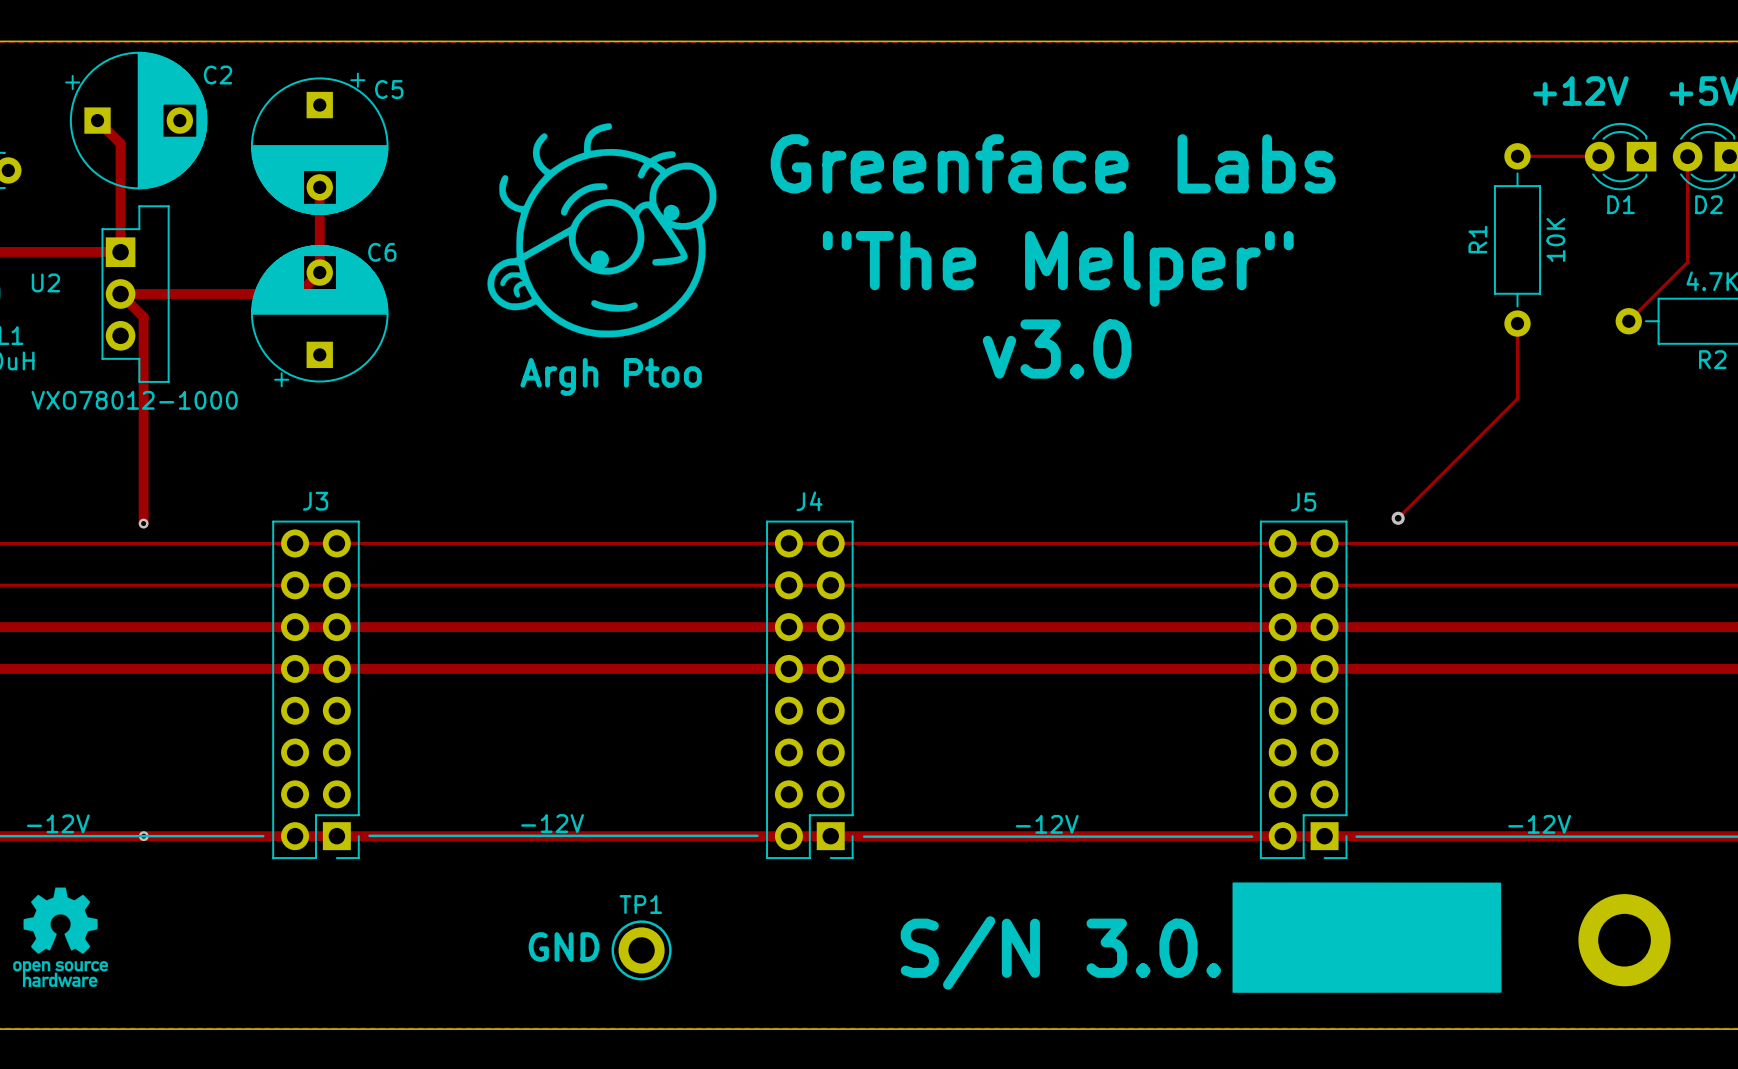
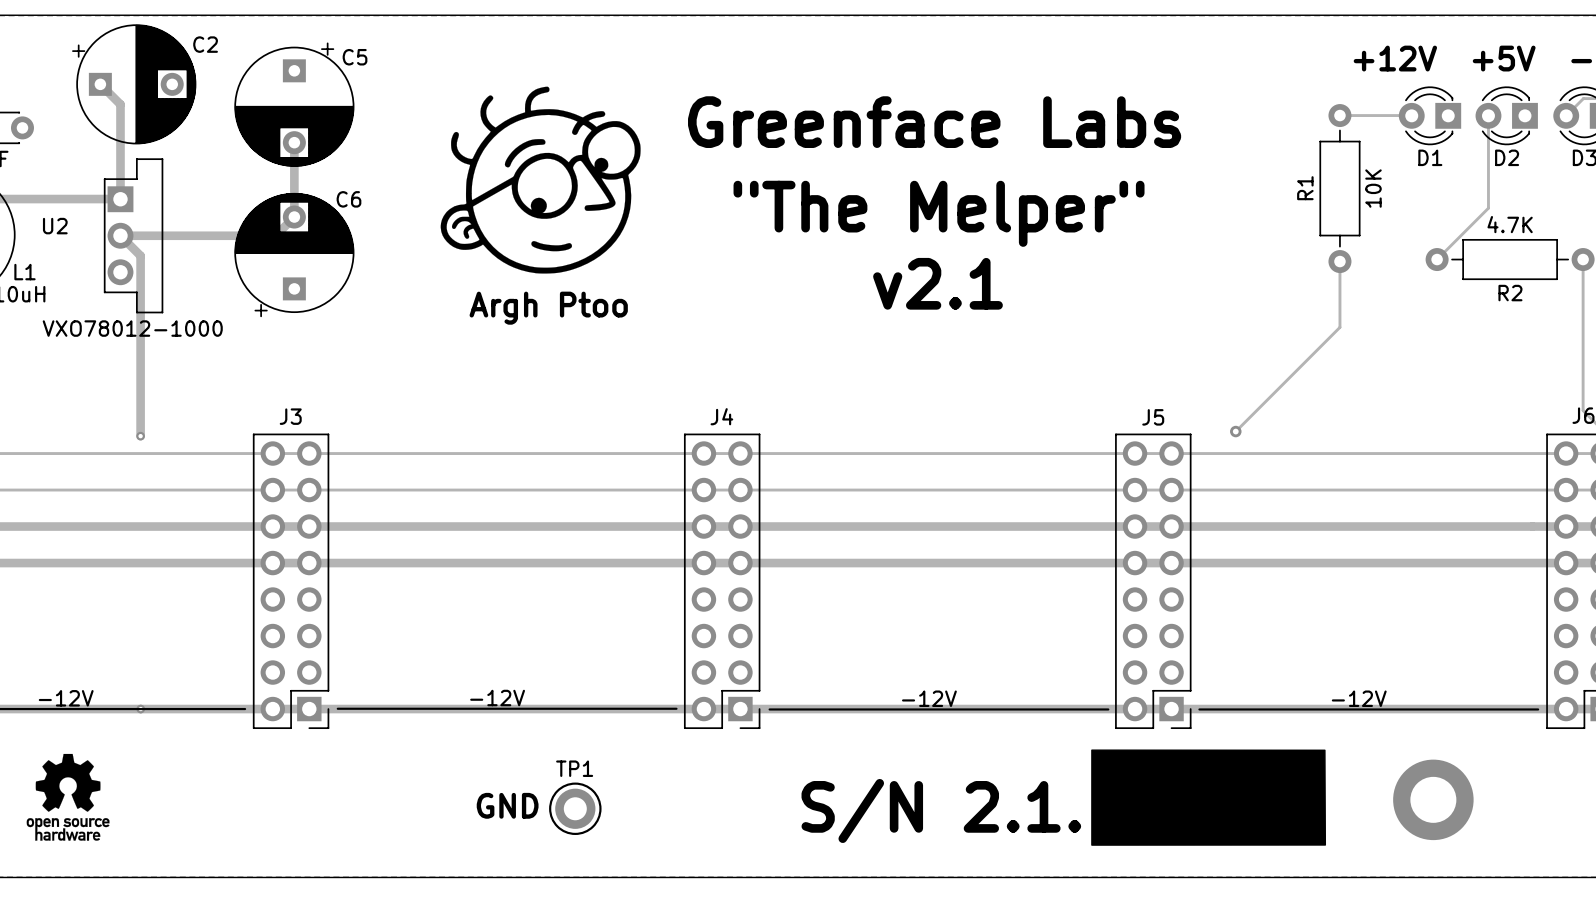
text: v3.0 (1057, 349) -> v2.1 (938, 283)
text: S/N 3.0. (1060, 952) -> S/N 2.1. (941, 810)

